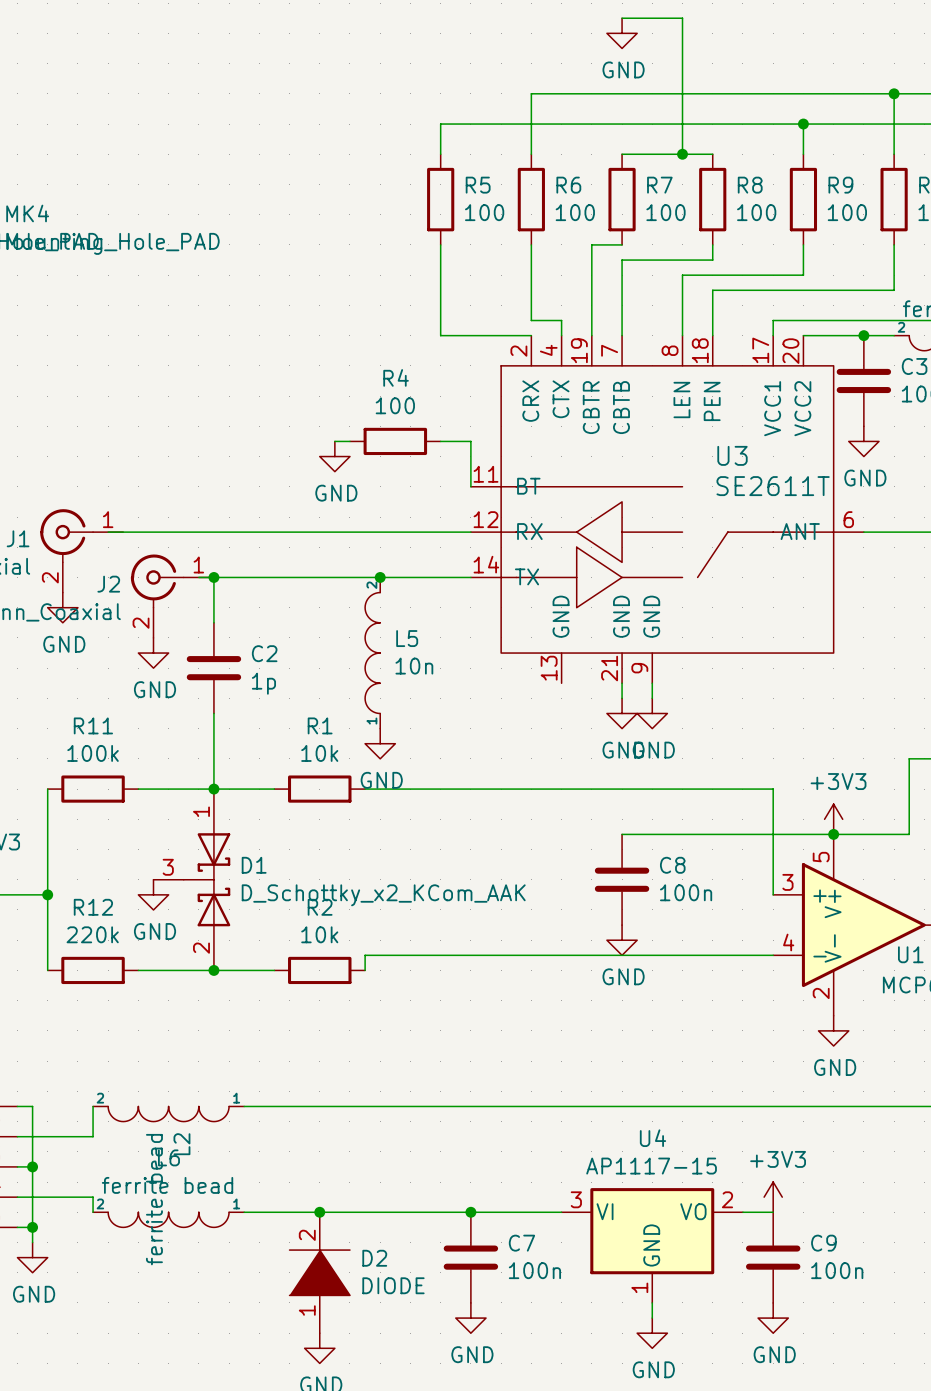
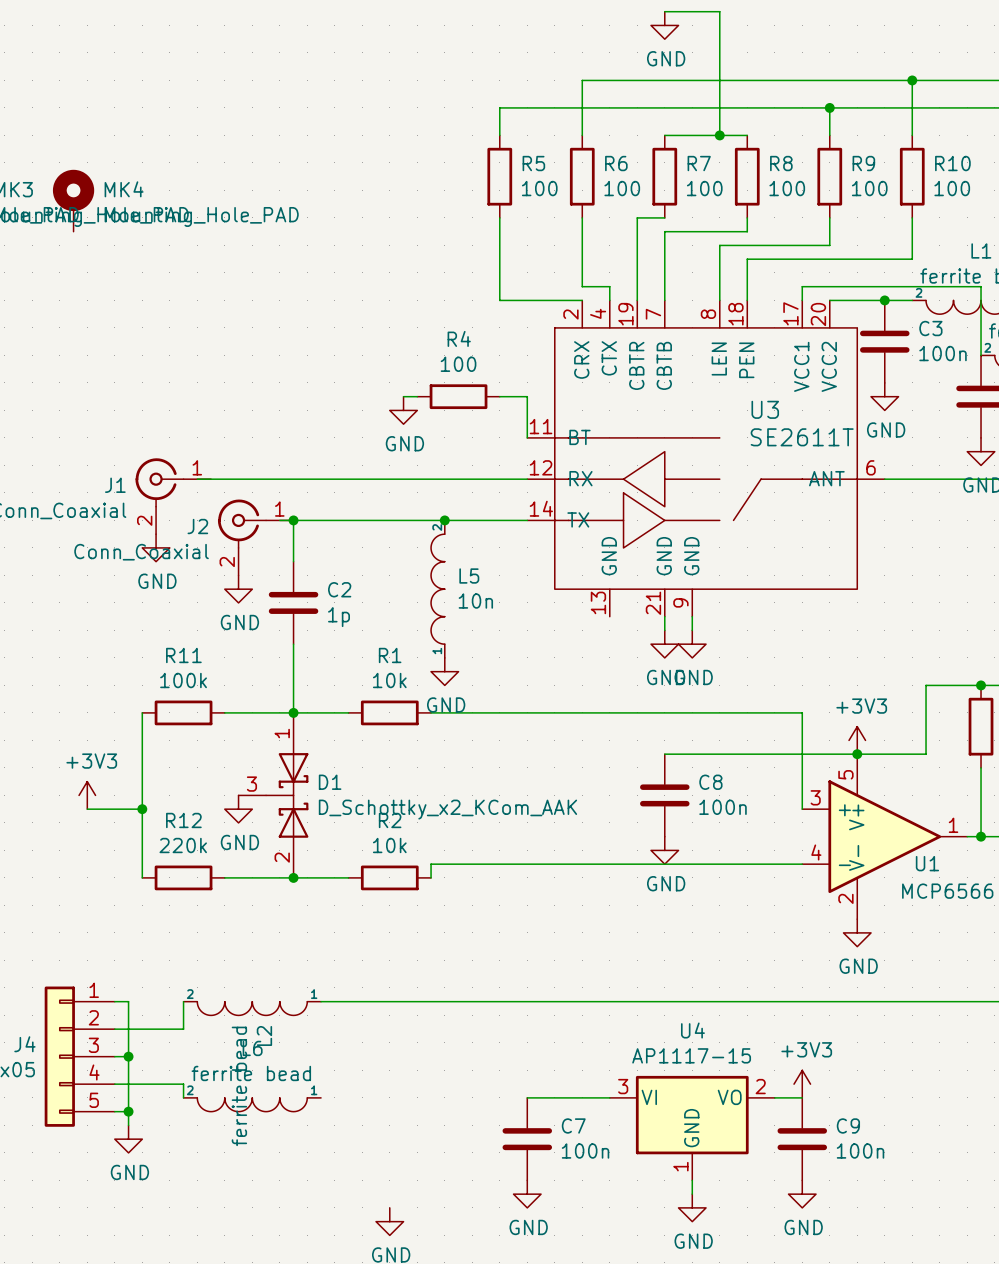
wire: (244, 1212) (470, 1212) -> none
junction: (319, 1212) -> none
junction: (470, 1212) -> none
D2: DIODE (319, 1272) -> none

